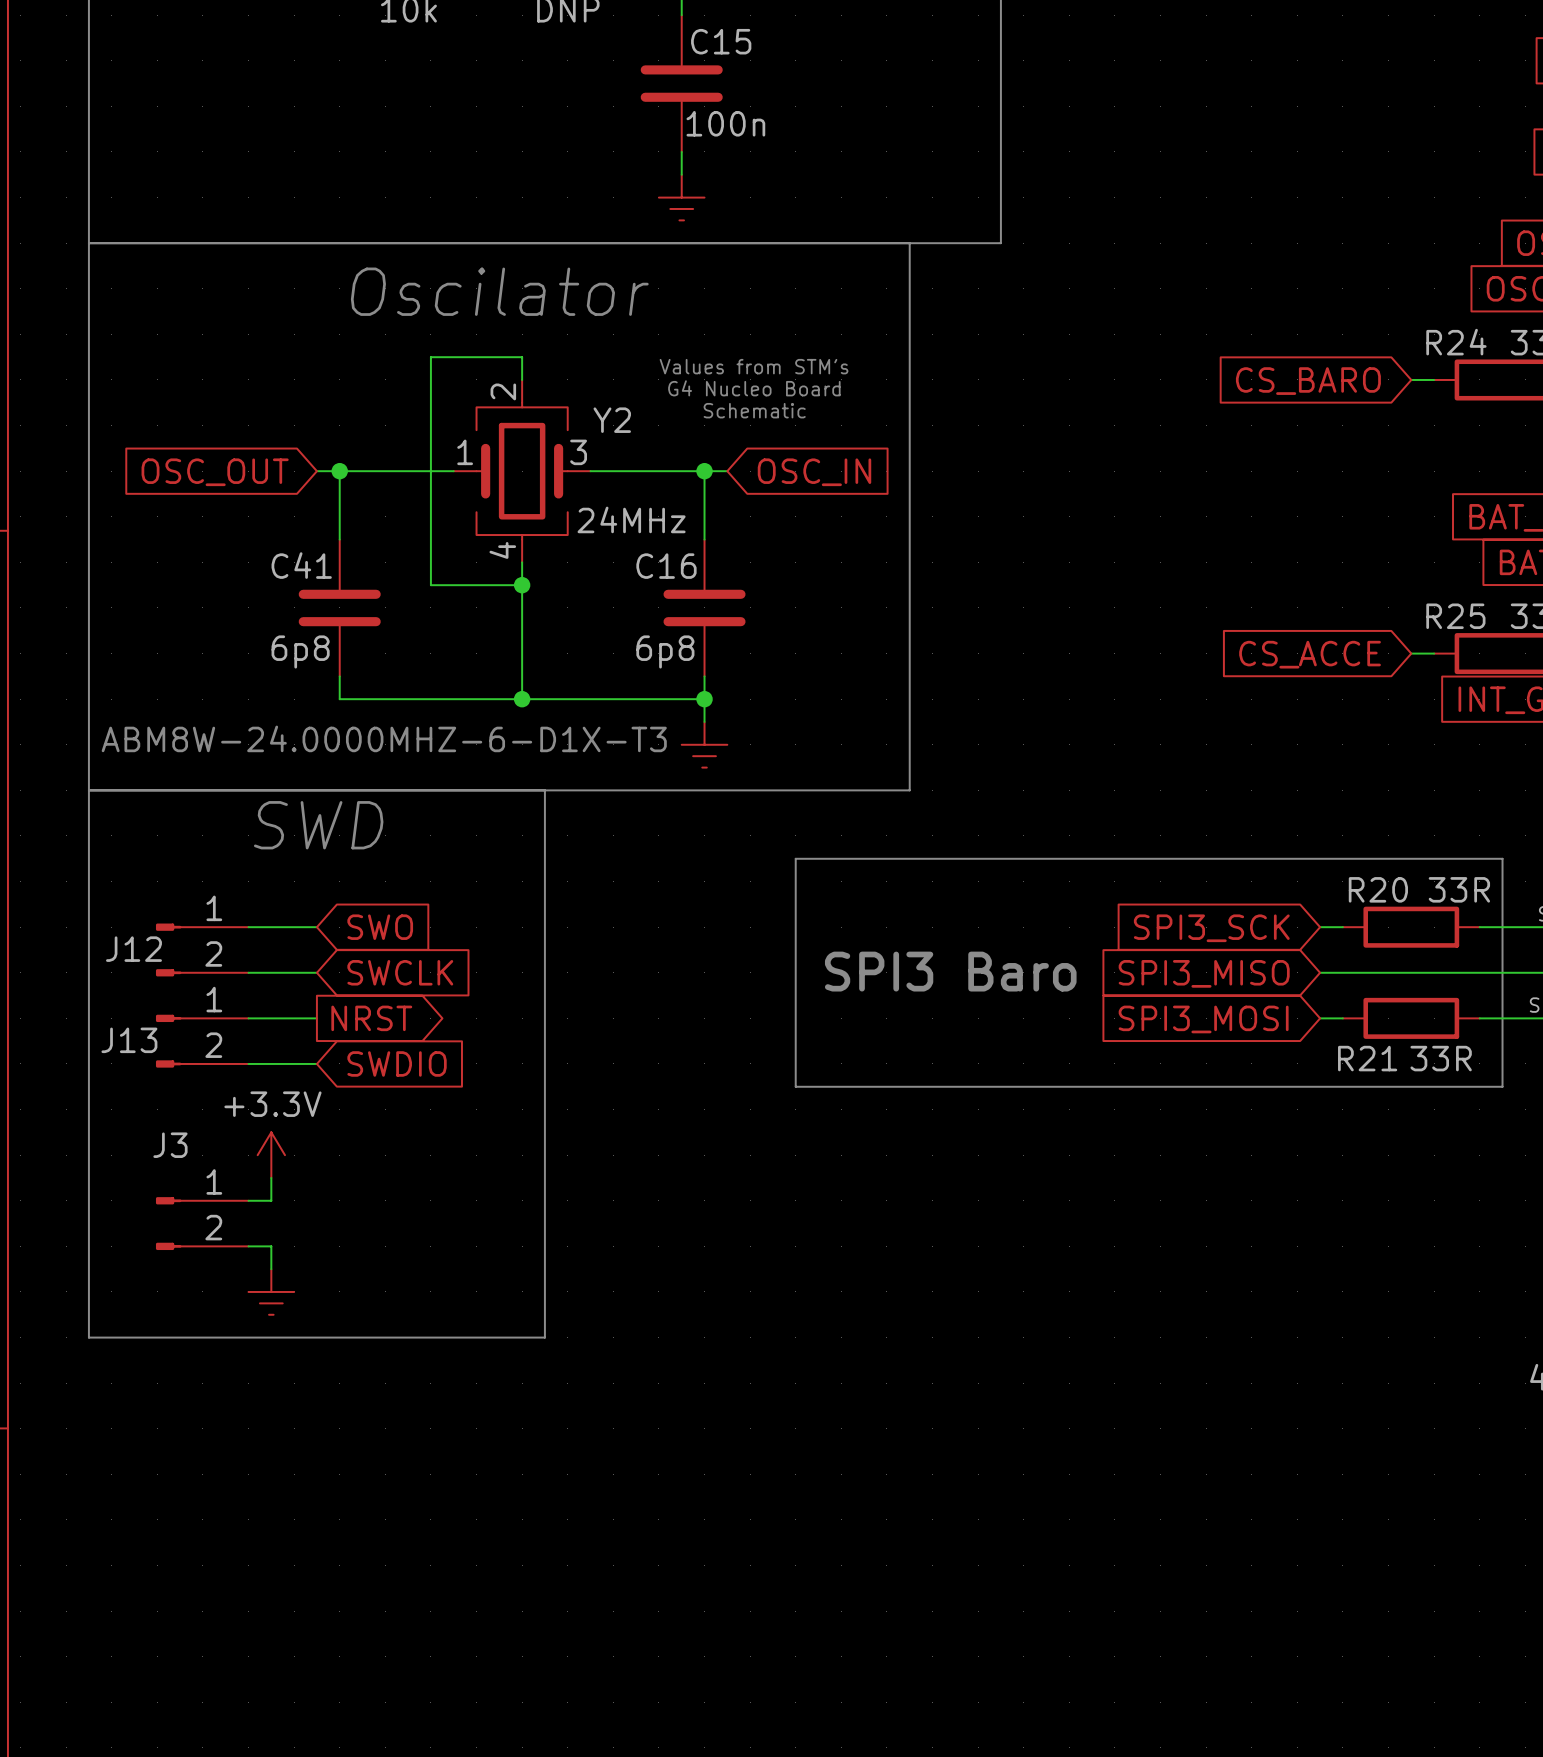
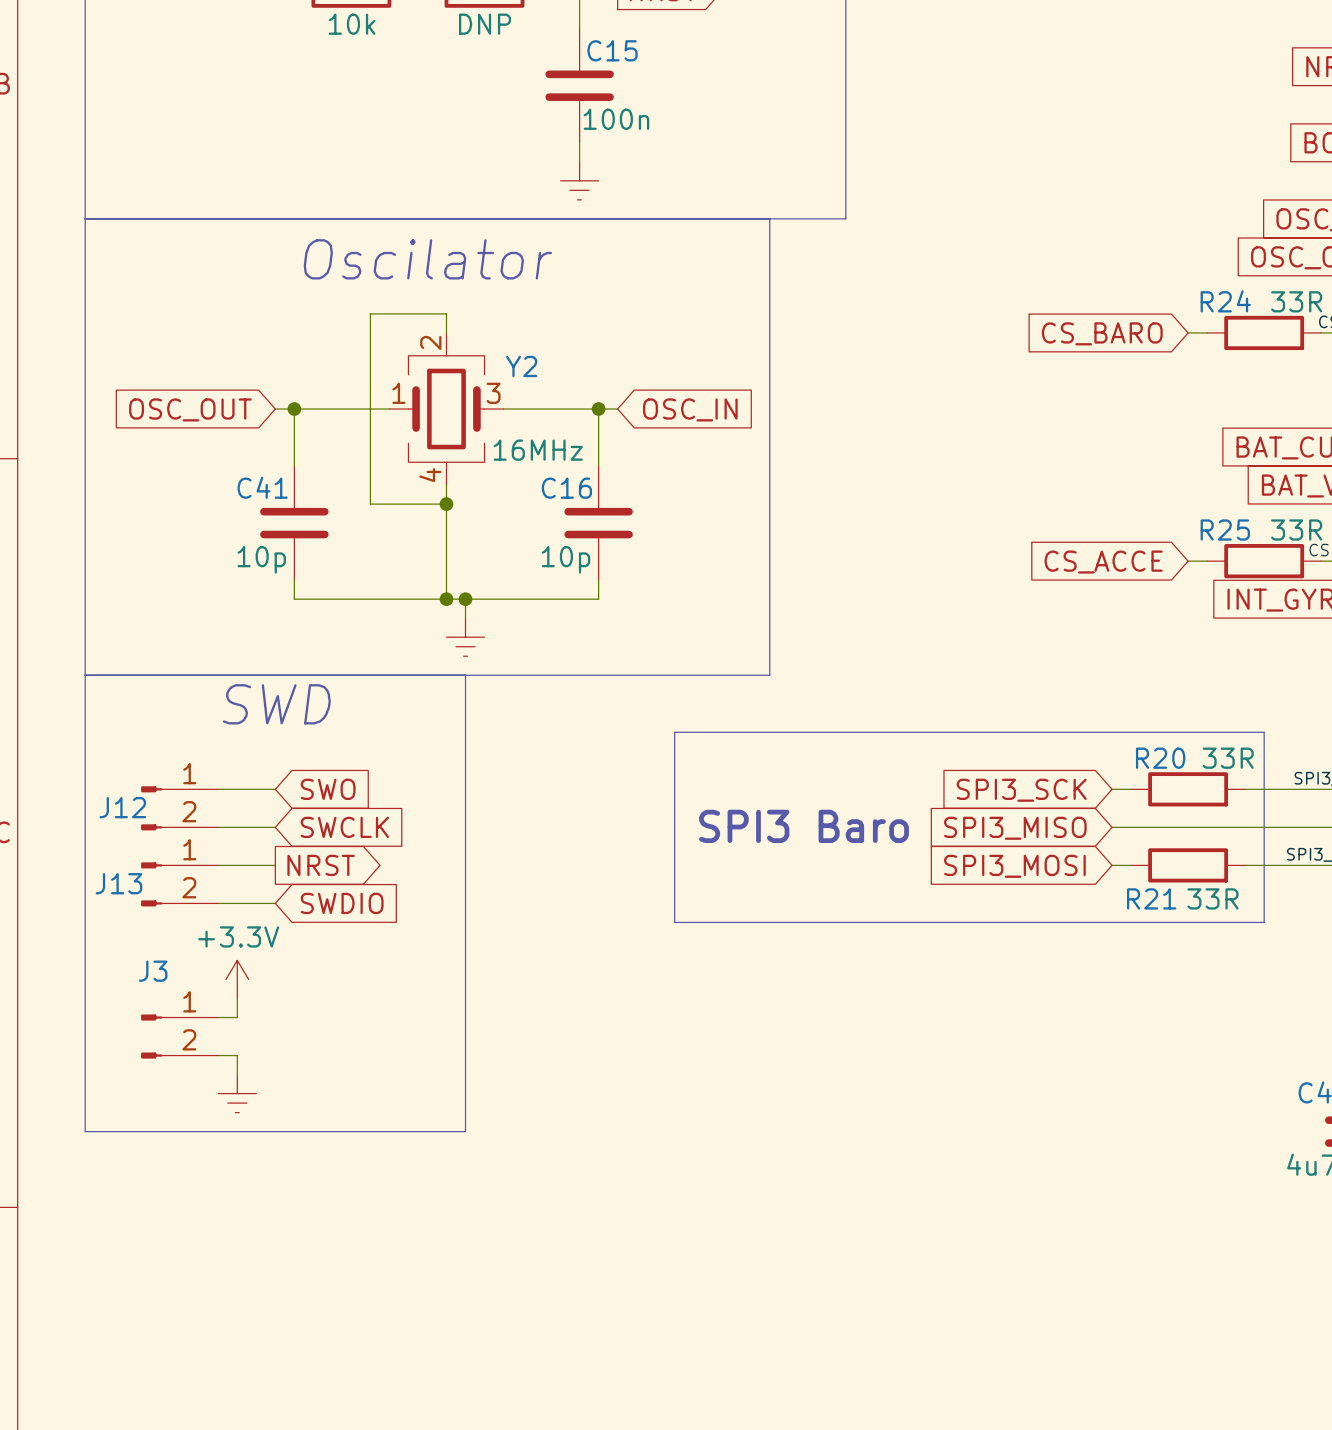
text: Values from STM's (754, 366) -> none
text: G4 Nucleo Board (754, 388) -> none
text: Schematic (754, 410) -> none
Y2 value: 24MHz (631, 519) -> 16MHz (538, 450)
C41 value: 6p8 (300, 651) -> 10p (261, 559)
C16 value: 6p8 (665, 651) -> 10p (565, 559)
junction: none -> (465, 599)
wire: (704, 699) (704, 721) -> (465, 599) (465, 618)
junction: (704, 699) -> none
text: ABM8W-24.0000MHZ-6-D1X-T3 (384, 738) -> none
power symbol position: (704, 744) -> (465, 637)

